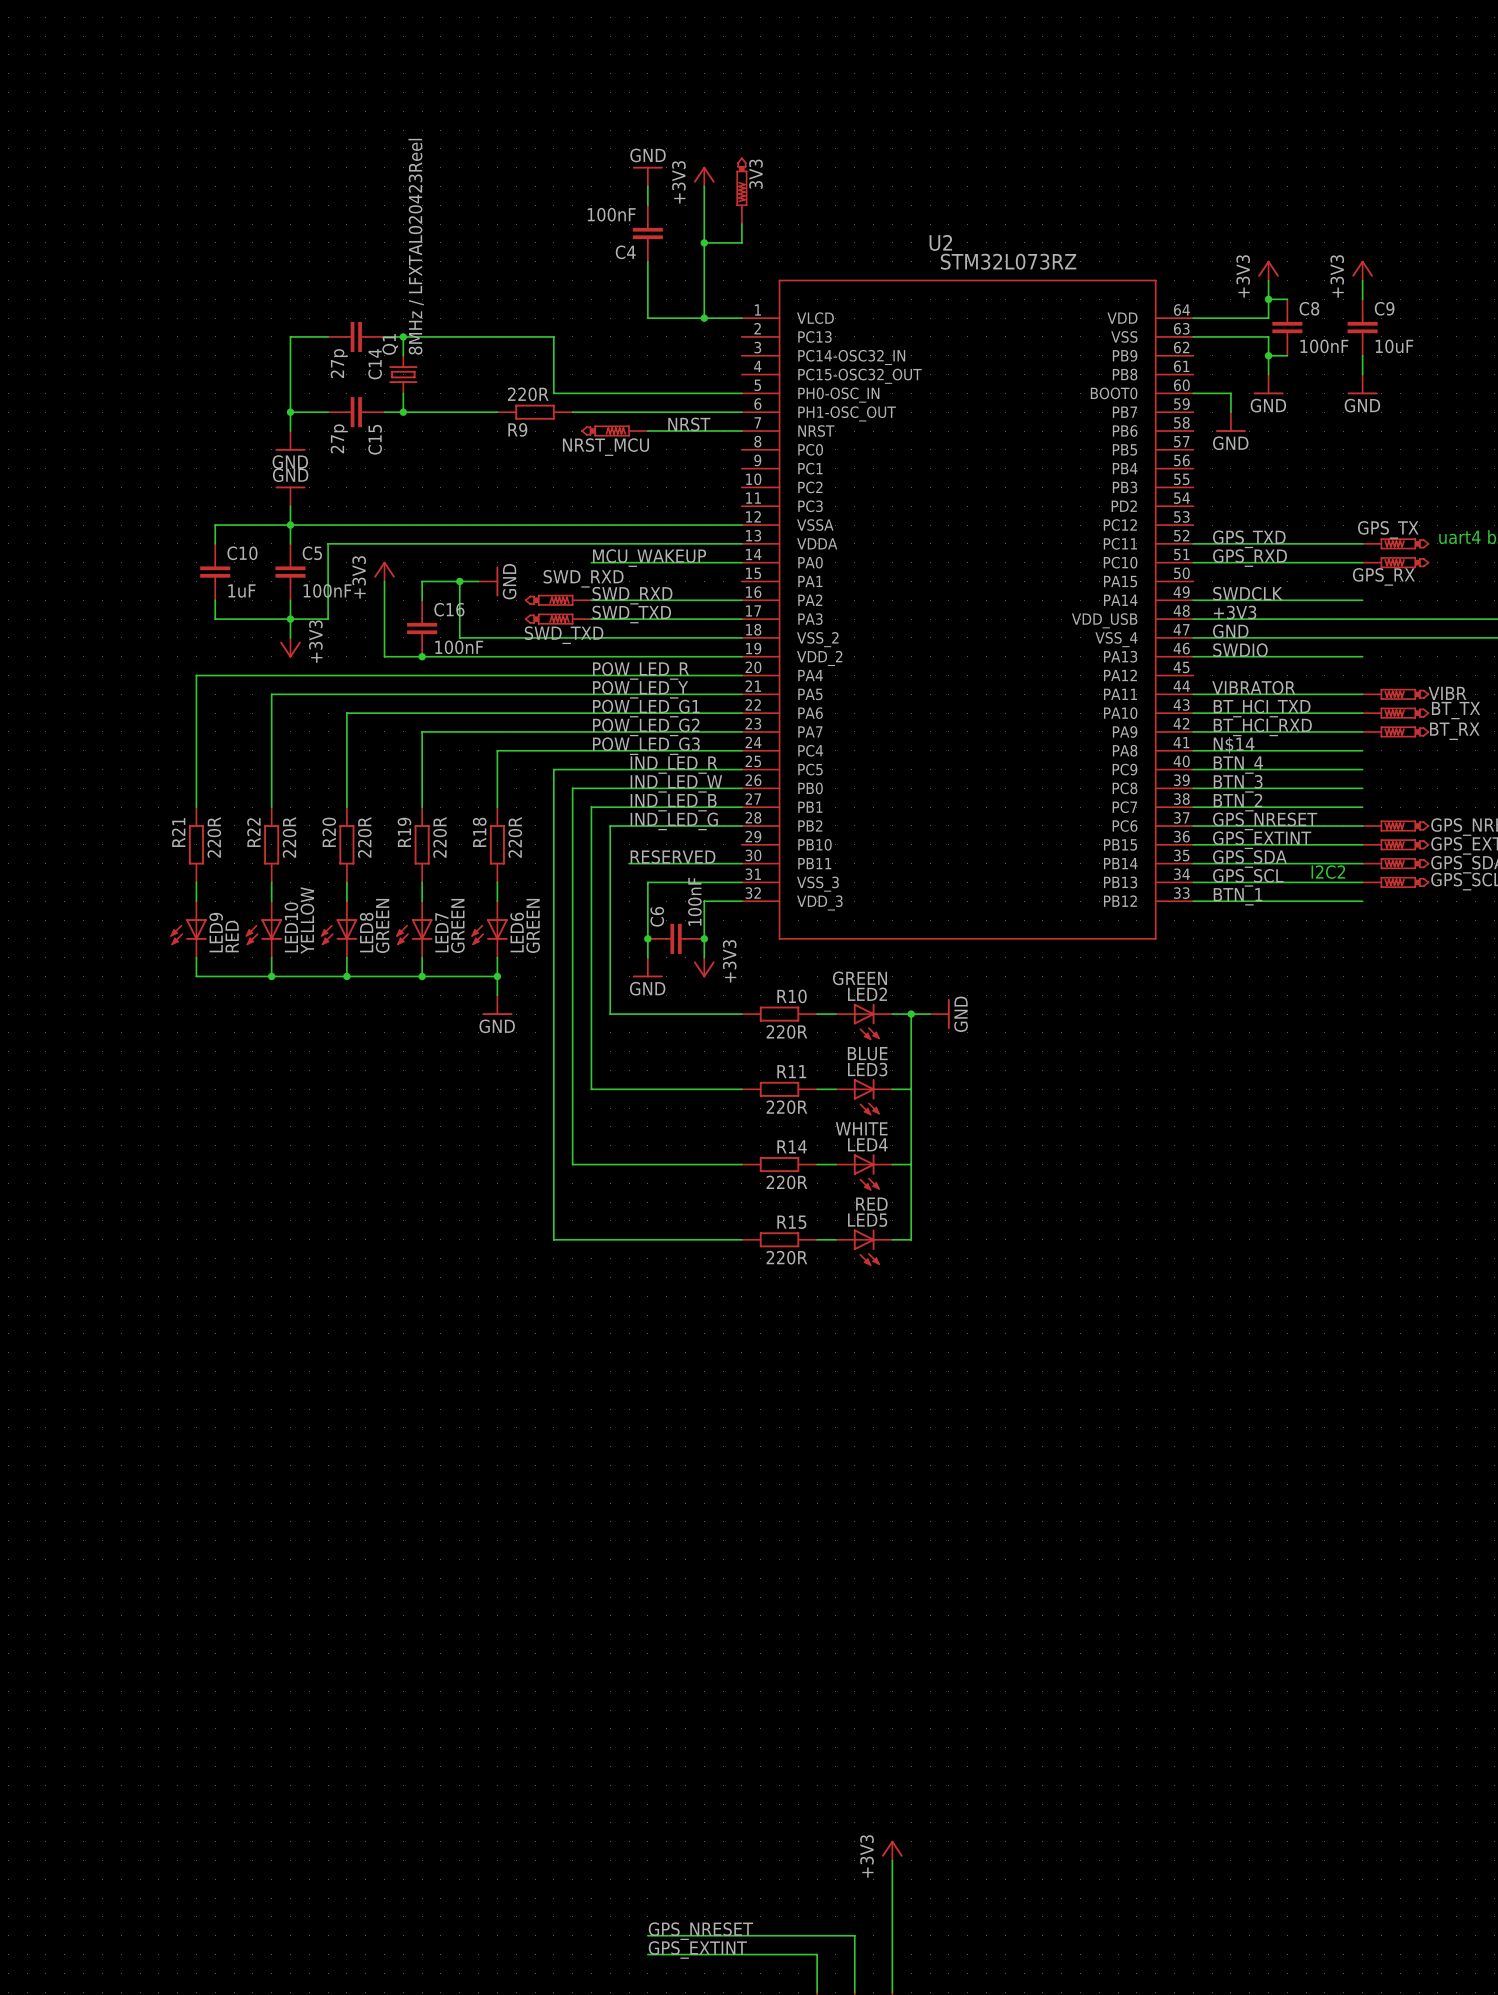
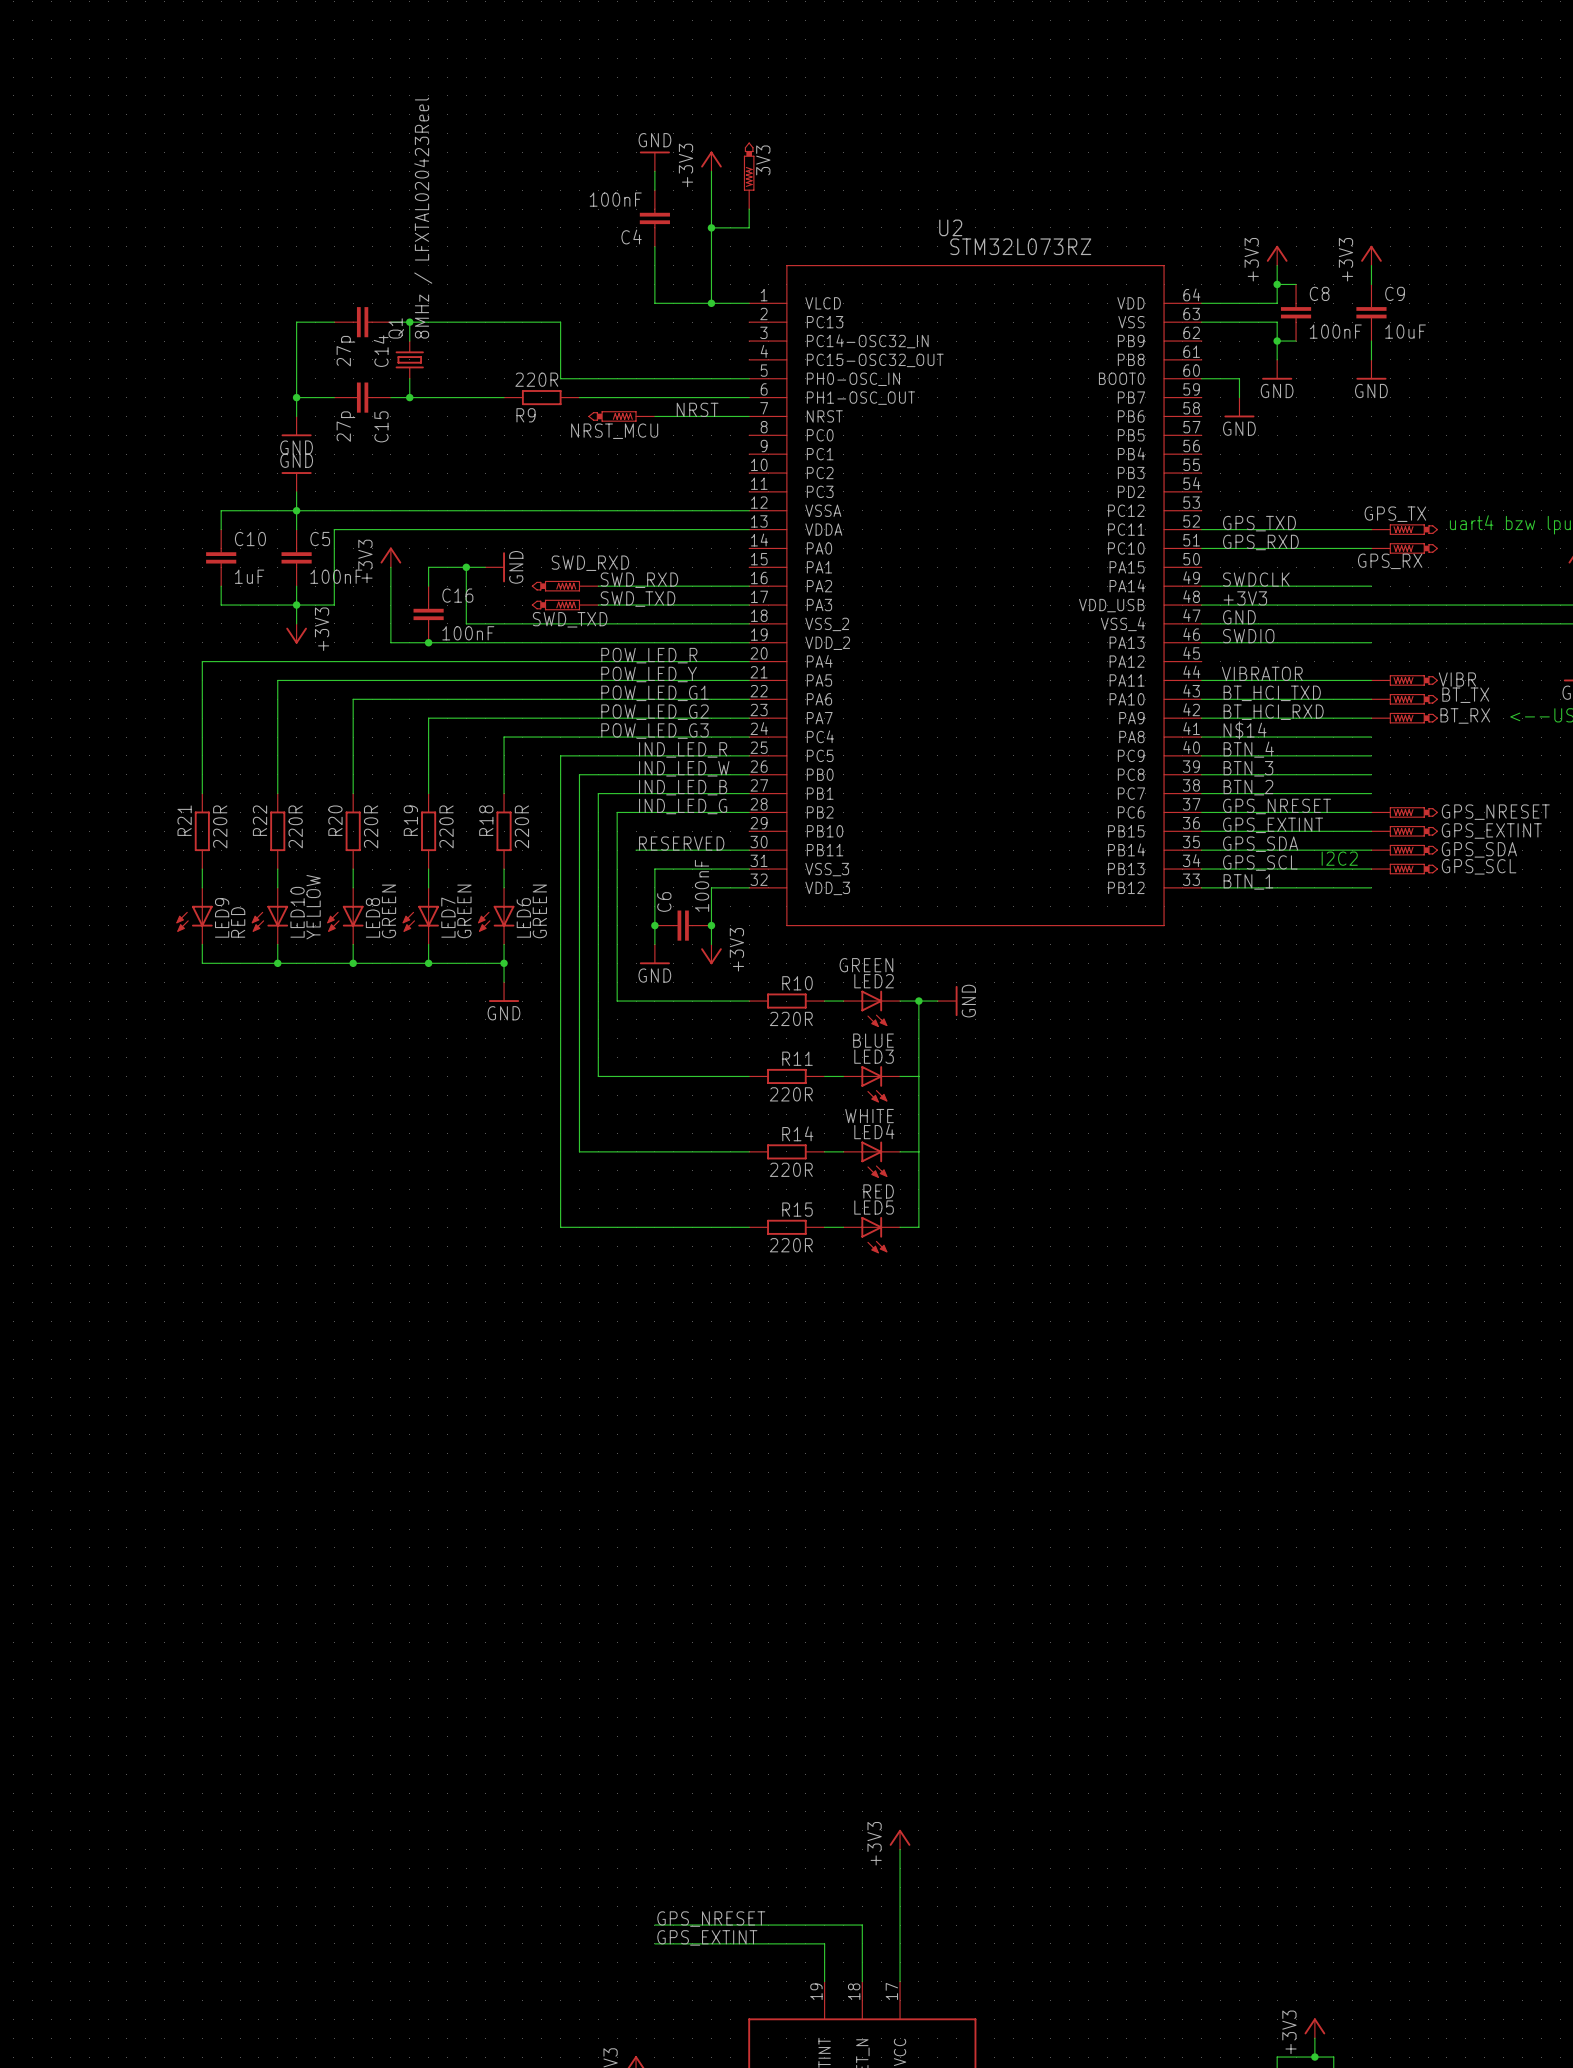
label: MCU_WAKEUP (649, 558) -> none
wire: (591, 562) (741, 562) -> none

